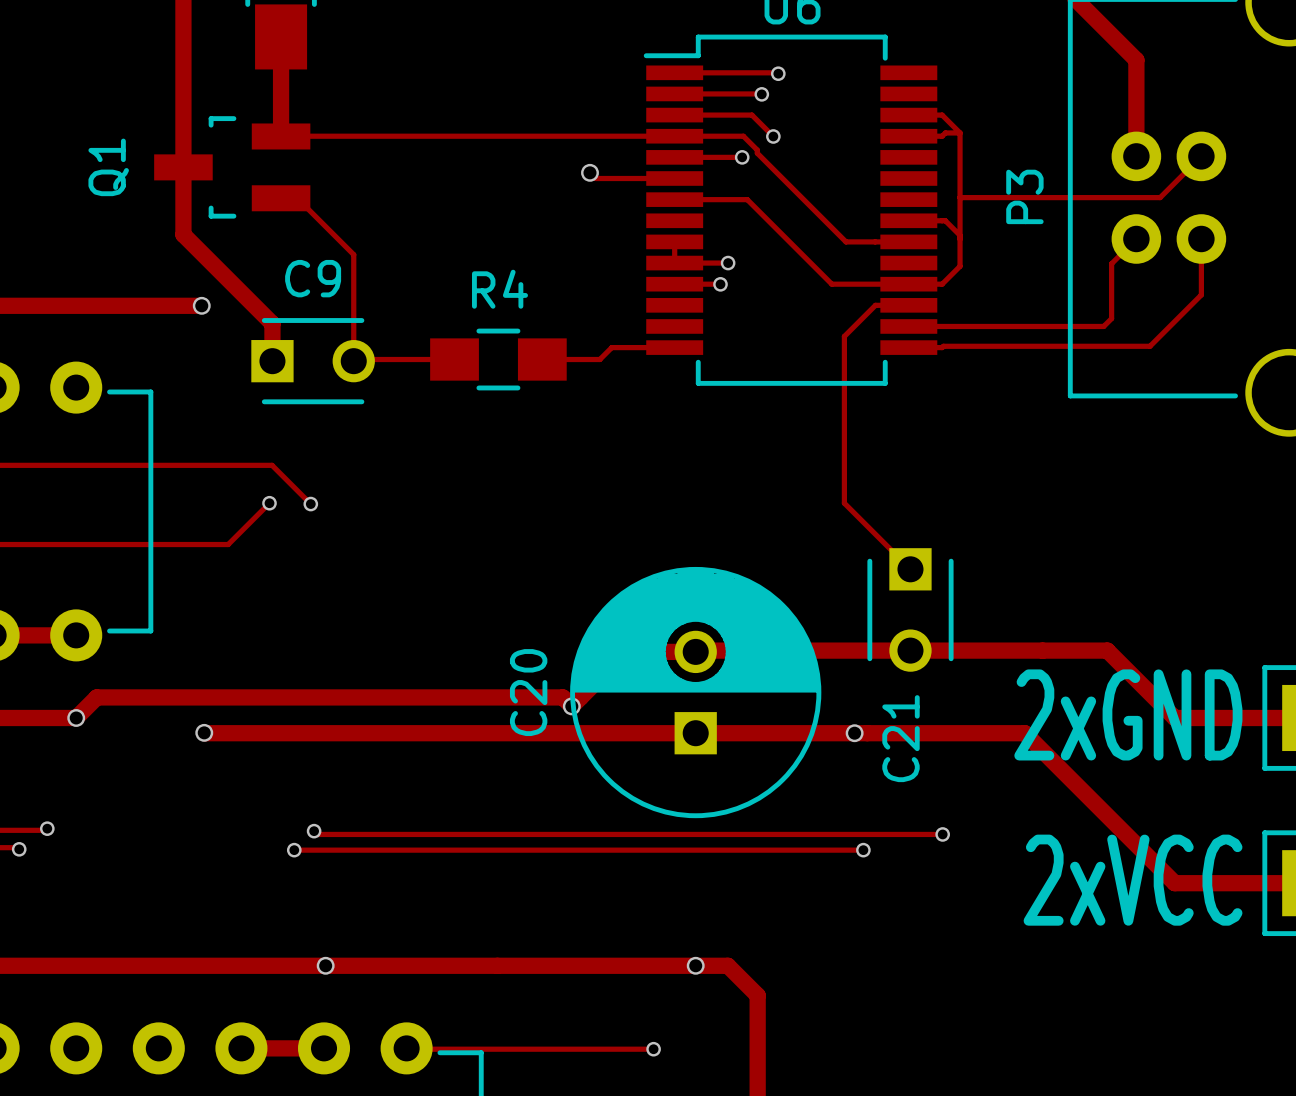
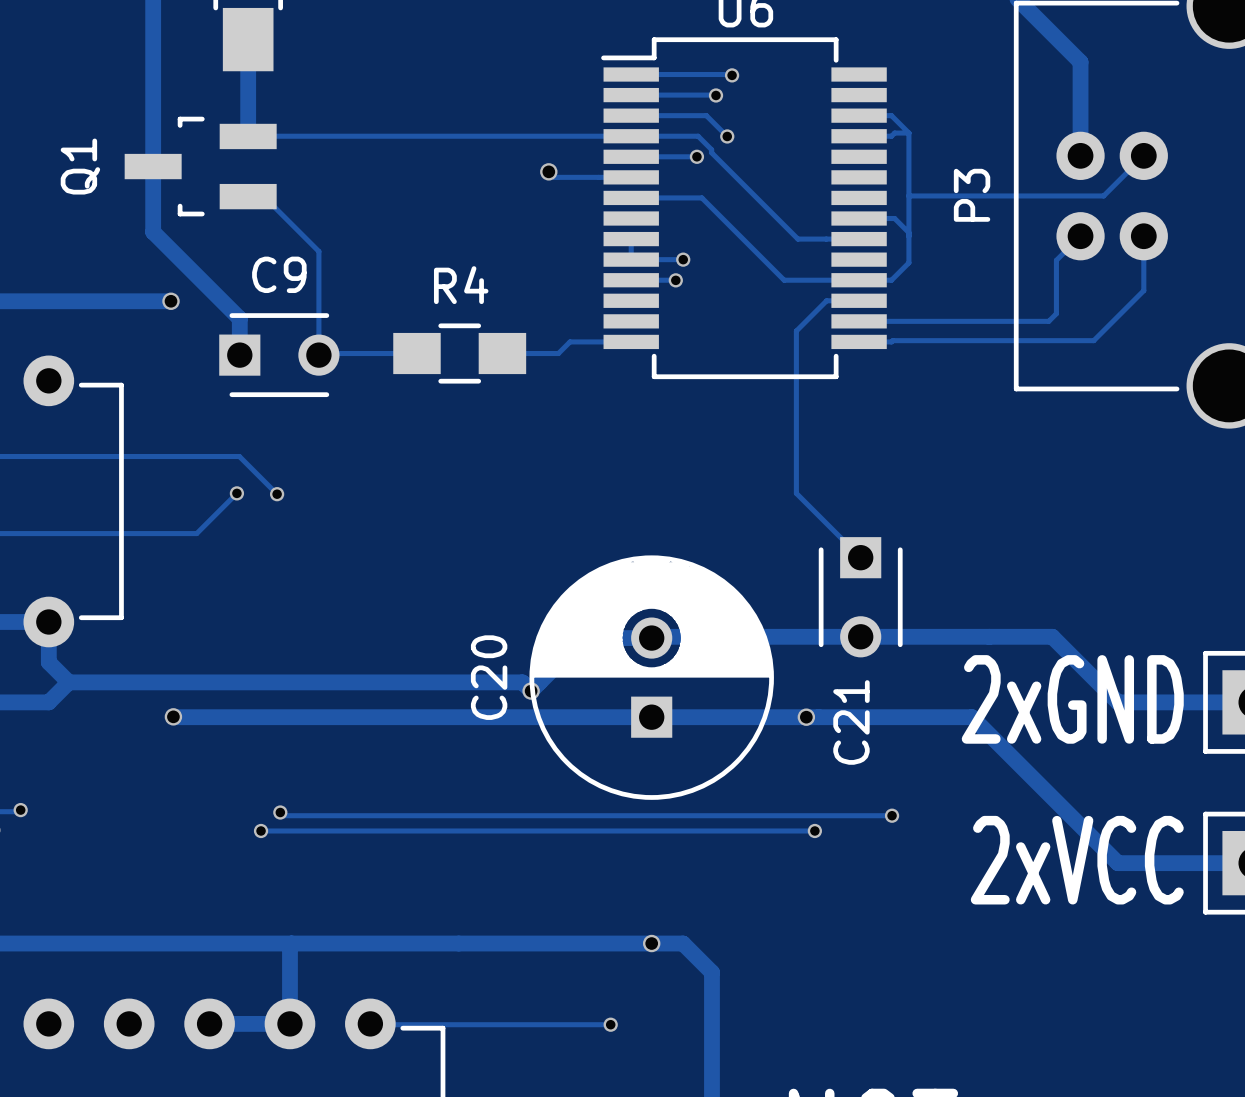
track: none -> (48, 621) (48, 662) (68, 682)
via: (76, 717) -> none
track: none -> (291, 943) (289, 945) (289, 1023)
via: (325, 965) -> none

